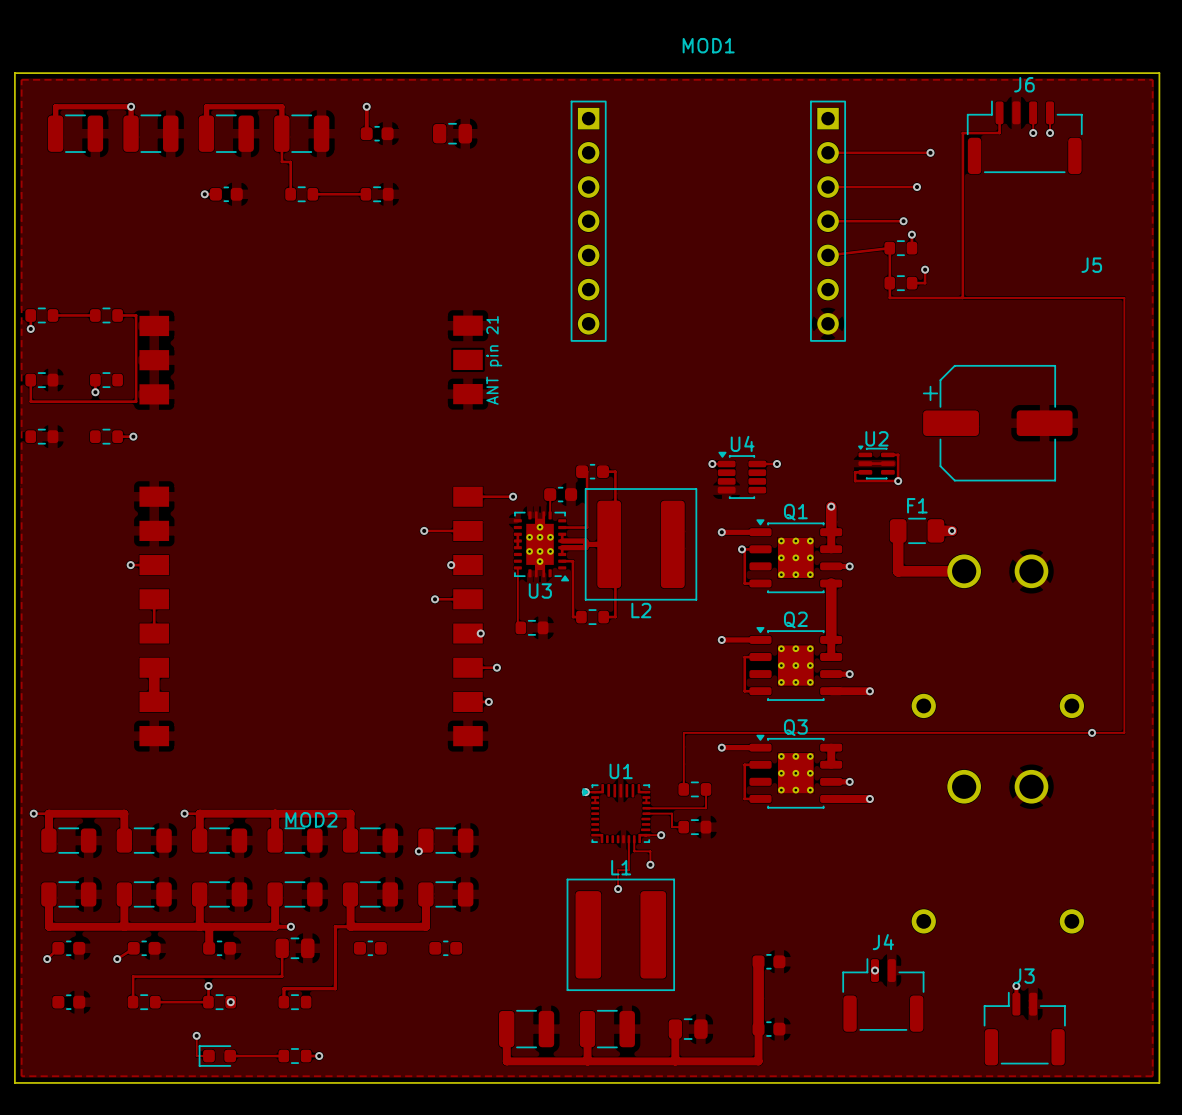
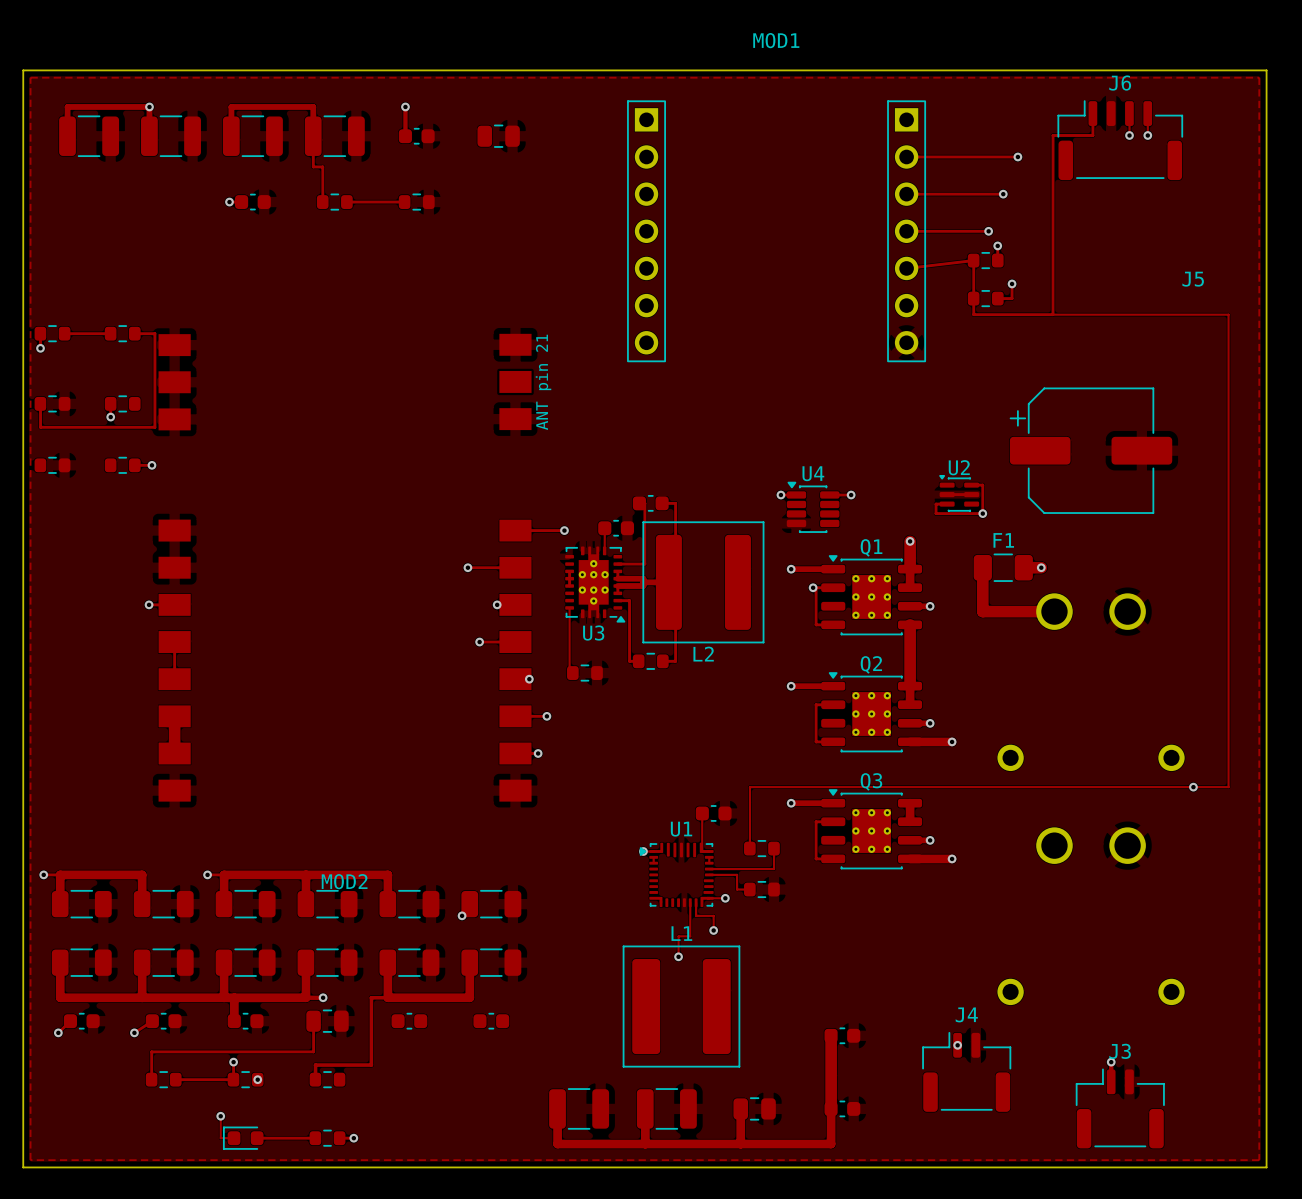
track: none -> (702, 813) (702, 851) (708, 851)
part: none -> (713, 813)
part: (68, 1002) -> none

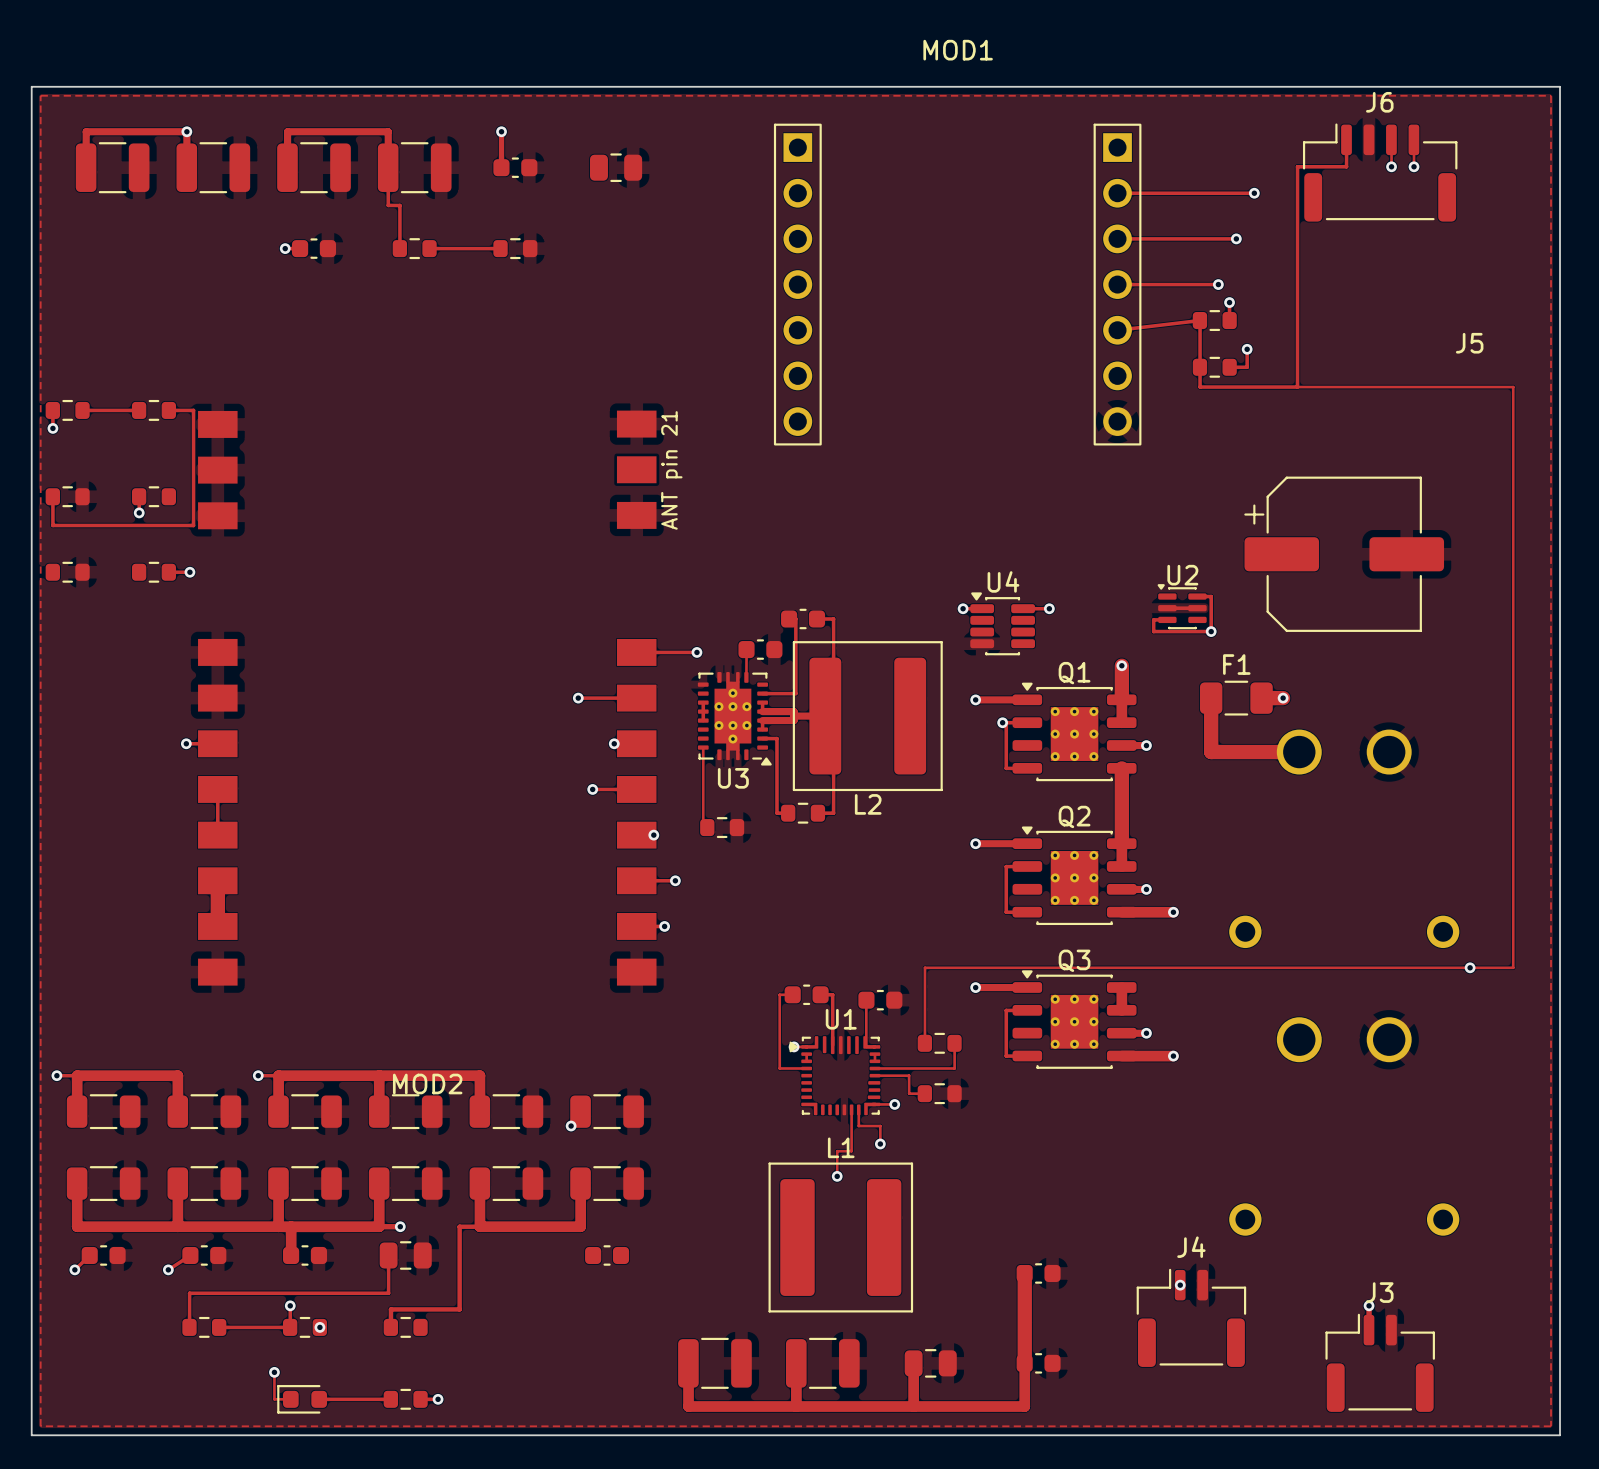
track: none -> (792, 994) (779, 994) (779, 1068) (806, 1068)
track: none -> (820, 994) (832, 994) (832, 1045)
part position: (409, 1021) -> (806, 994)

